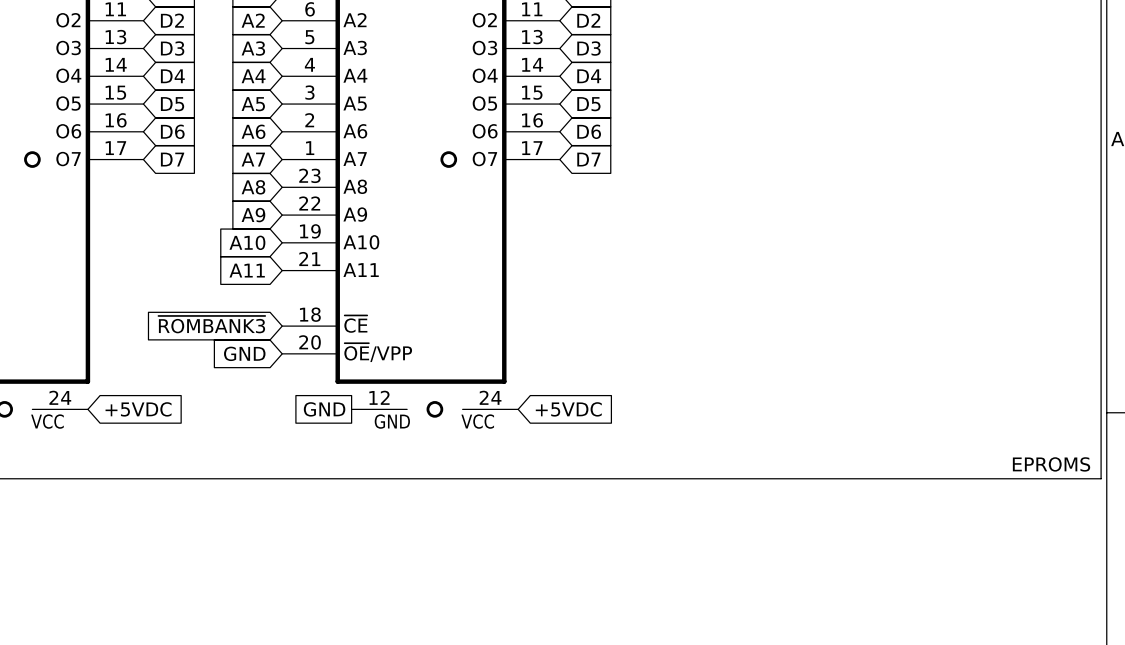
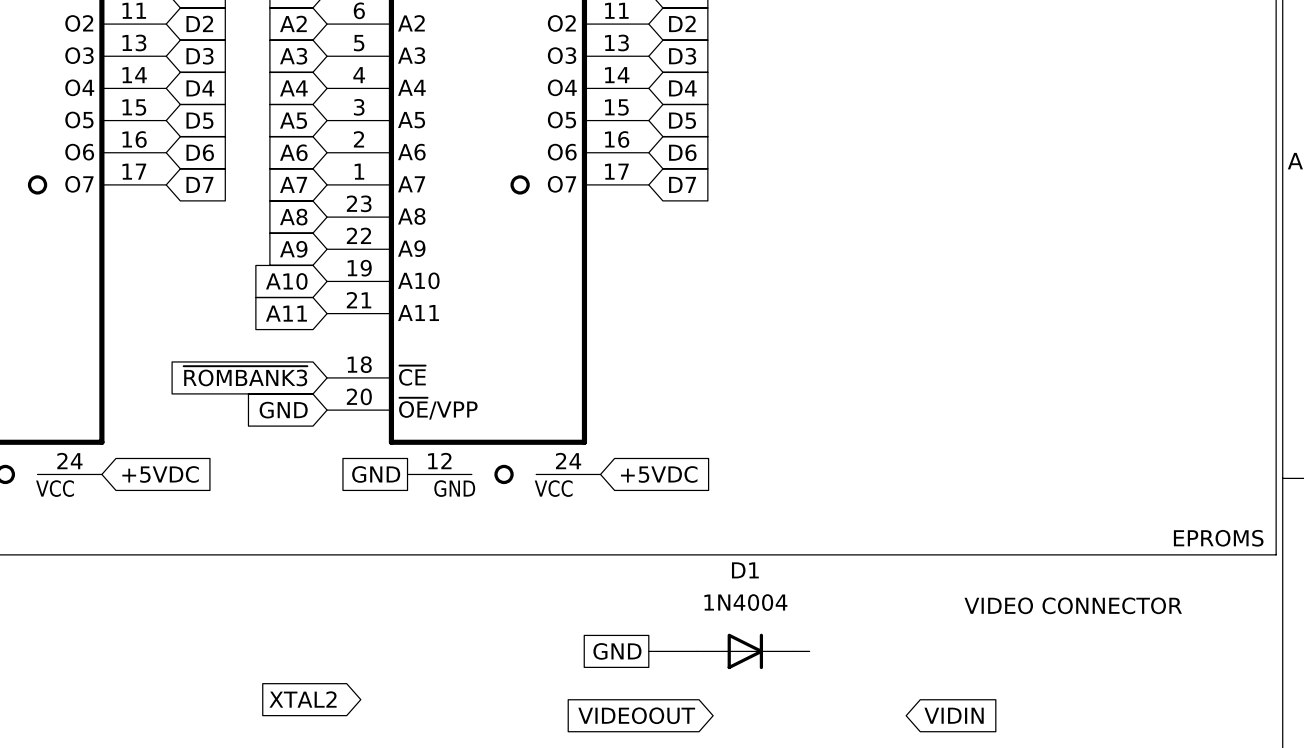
text: none -> VIDEO CONNECTOR (1073, 605)
global label: none -> GND (617, 651)
wire: none -> (648, 651) (697, 651)
D1: none -> 1N4004 (745, 651)
wire: none -> (793, 651) (809, 651)
global label: none -> XTAL2 (303, 699)
global label: none -> VIDEOOUT (636, 715)
global label: none -> VIDIN (954, 715)

